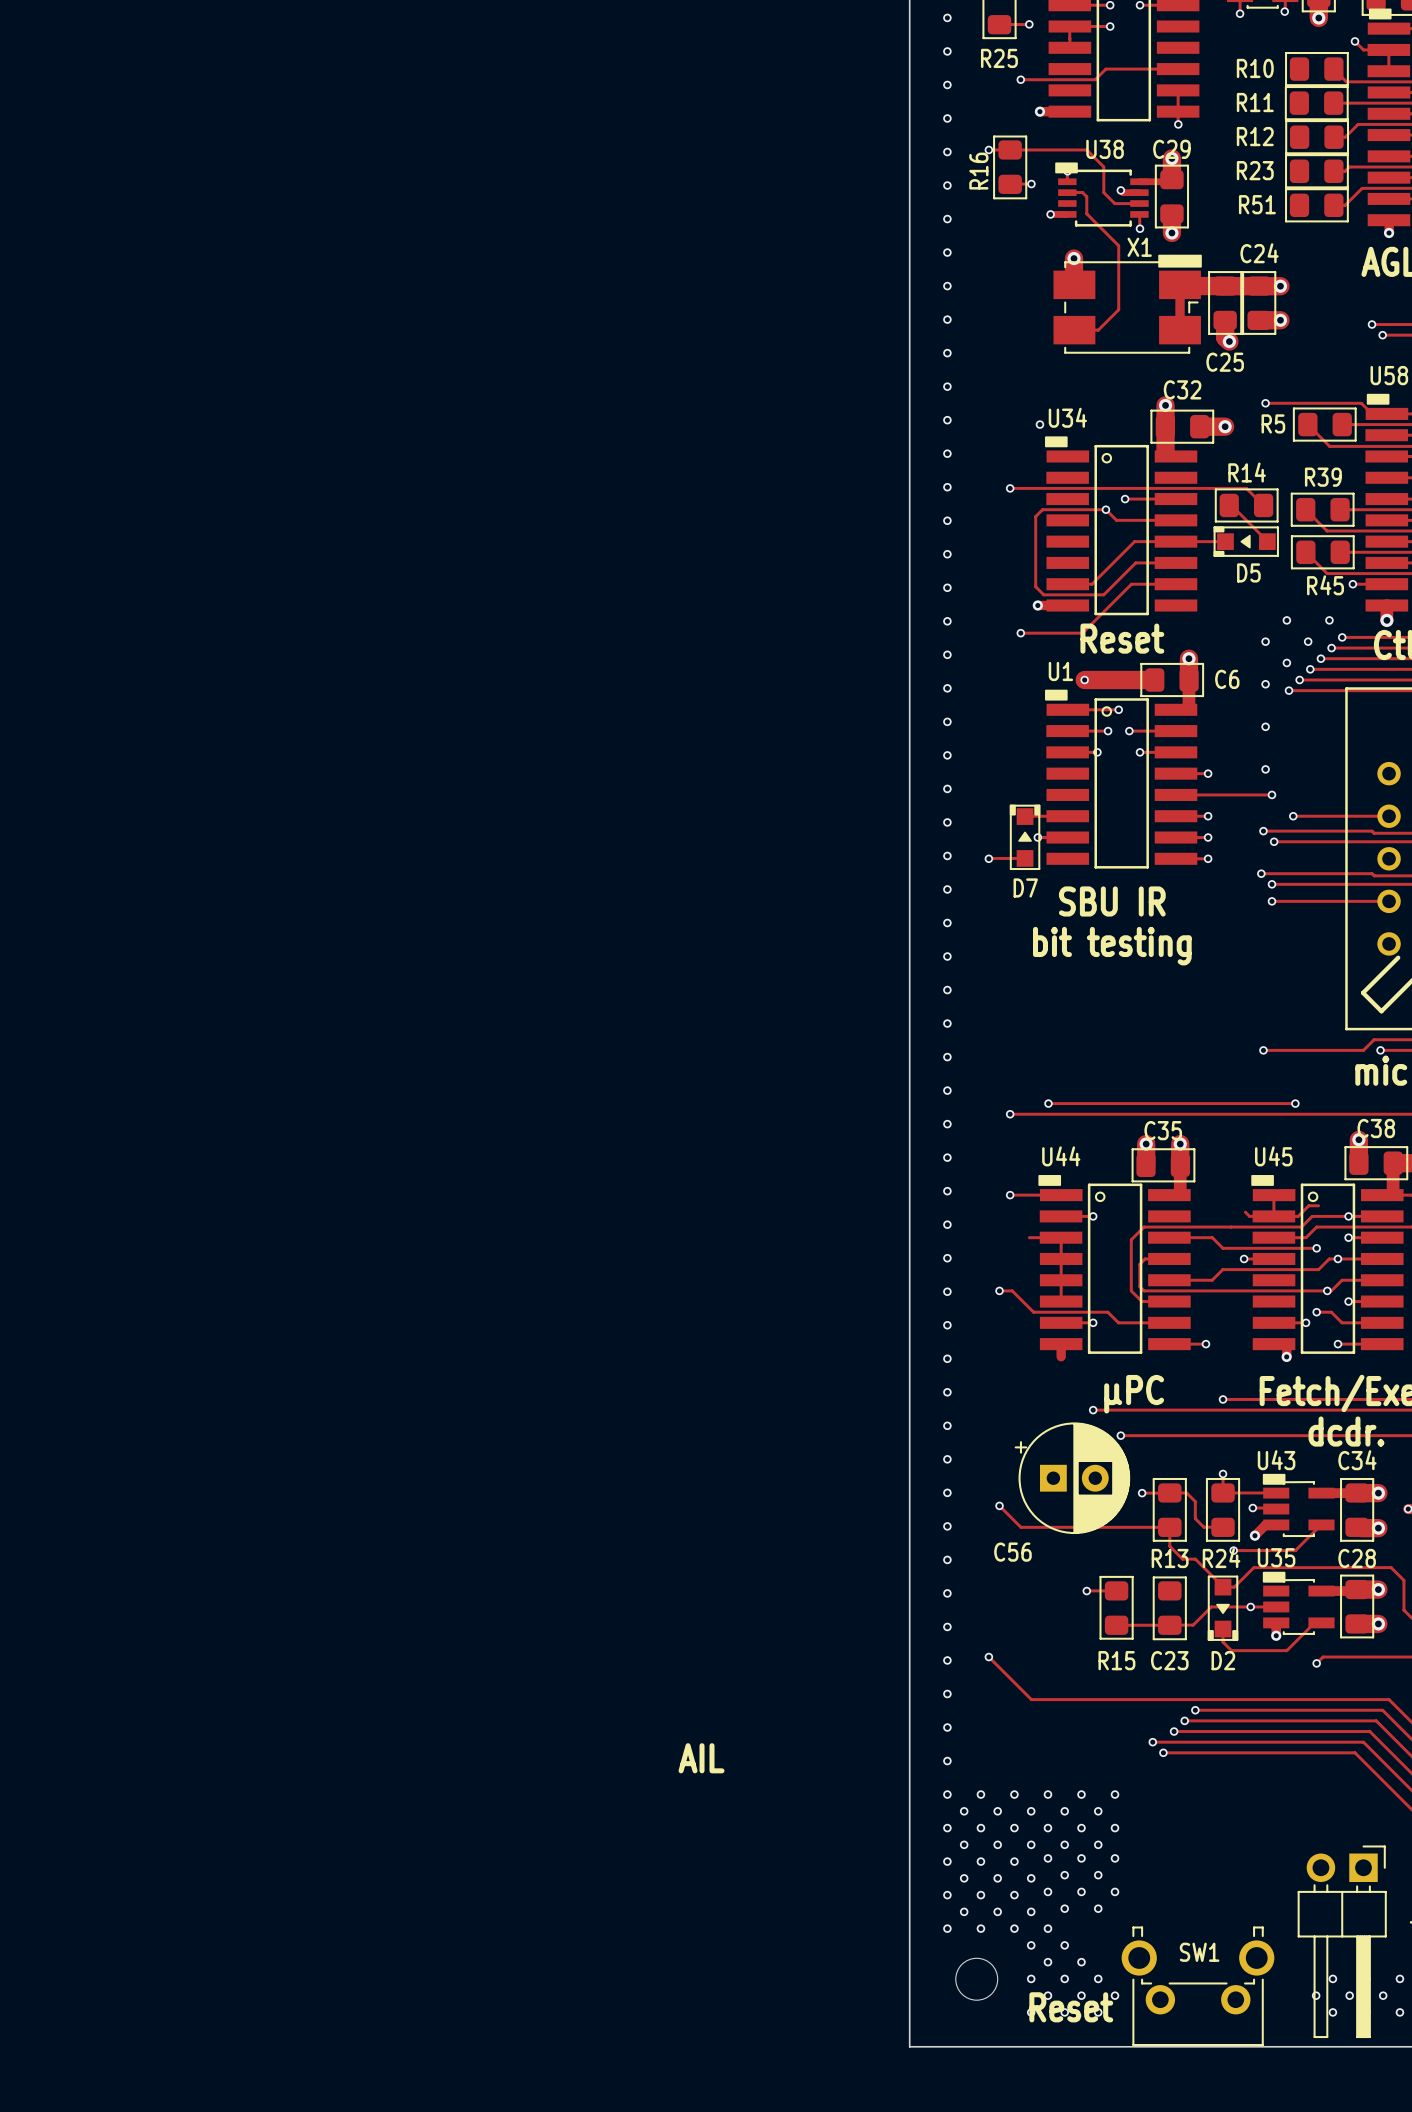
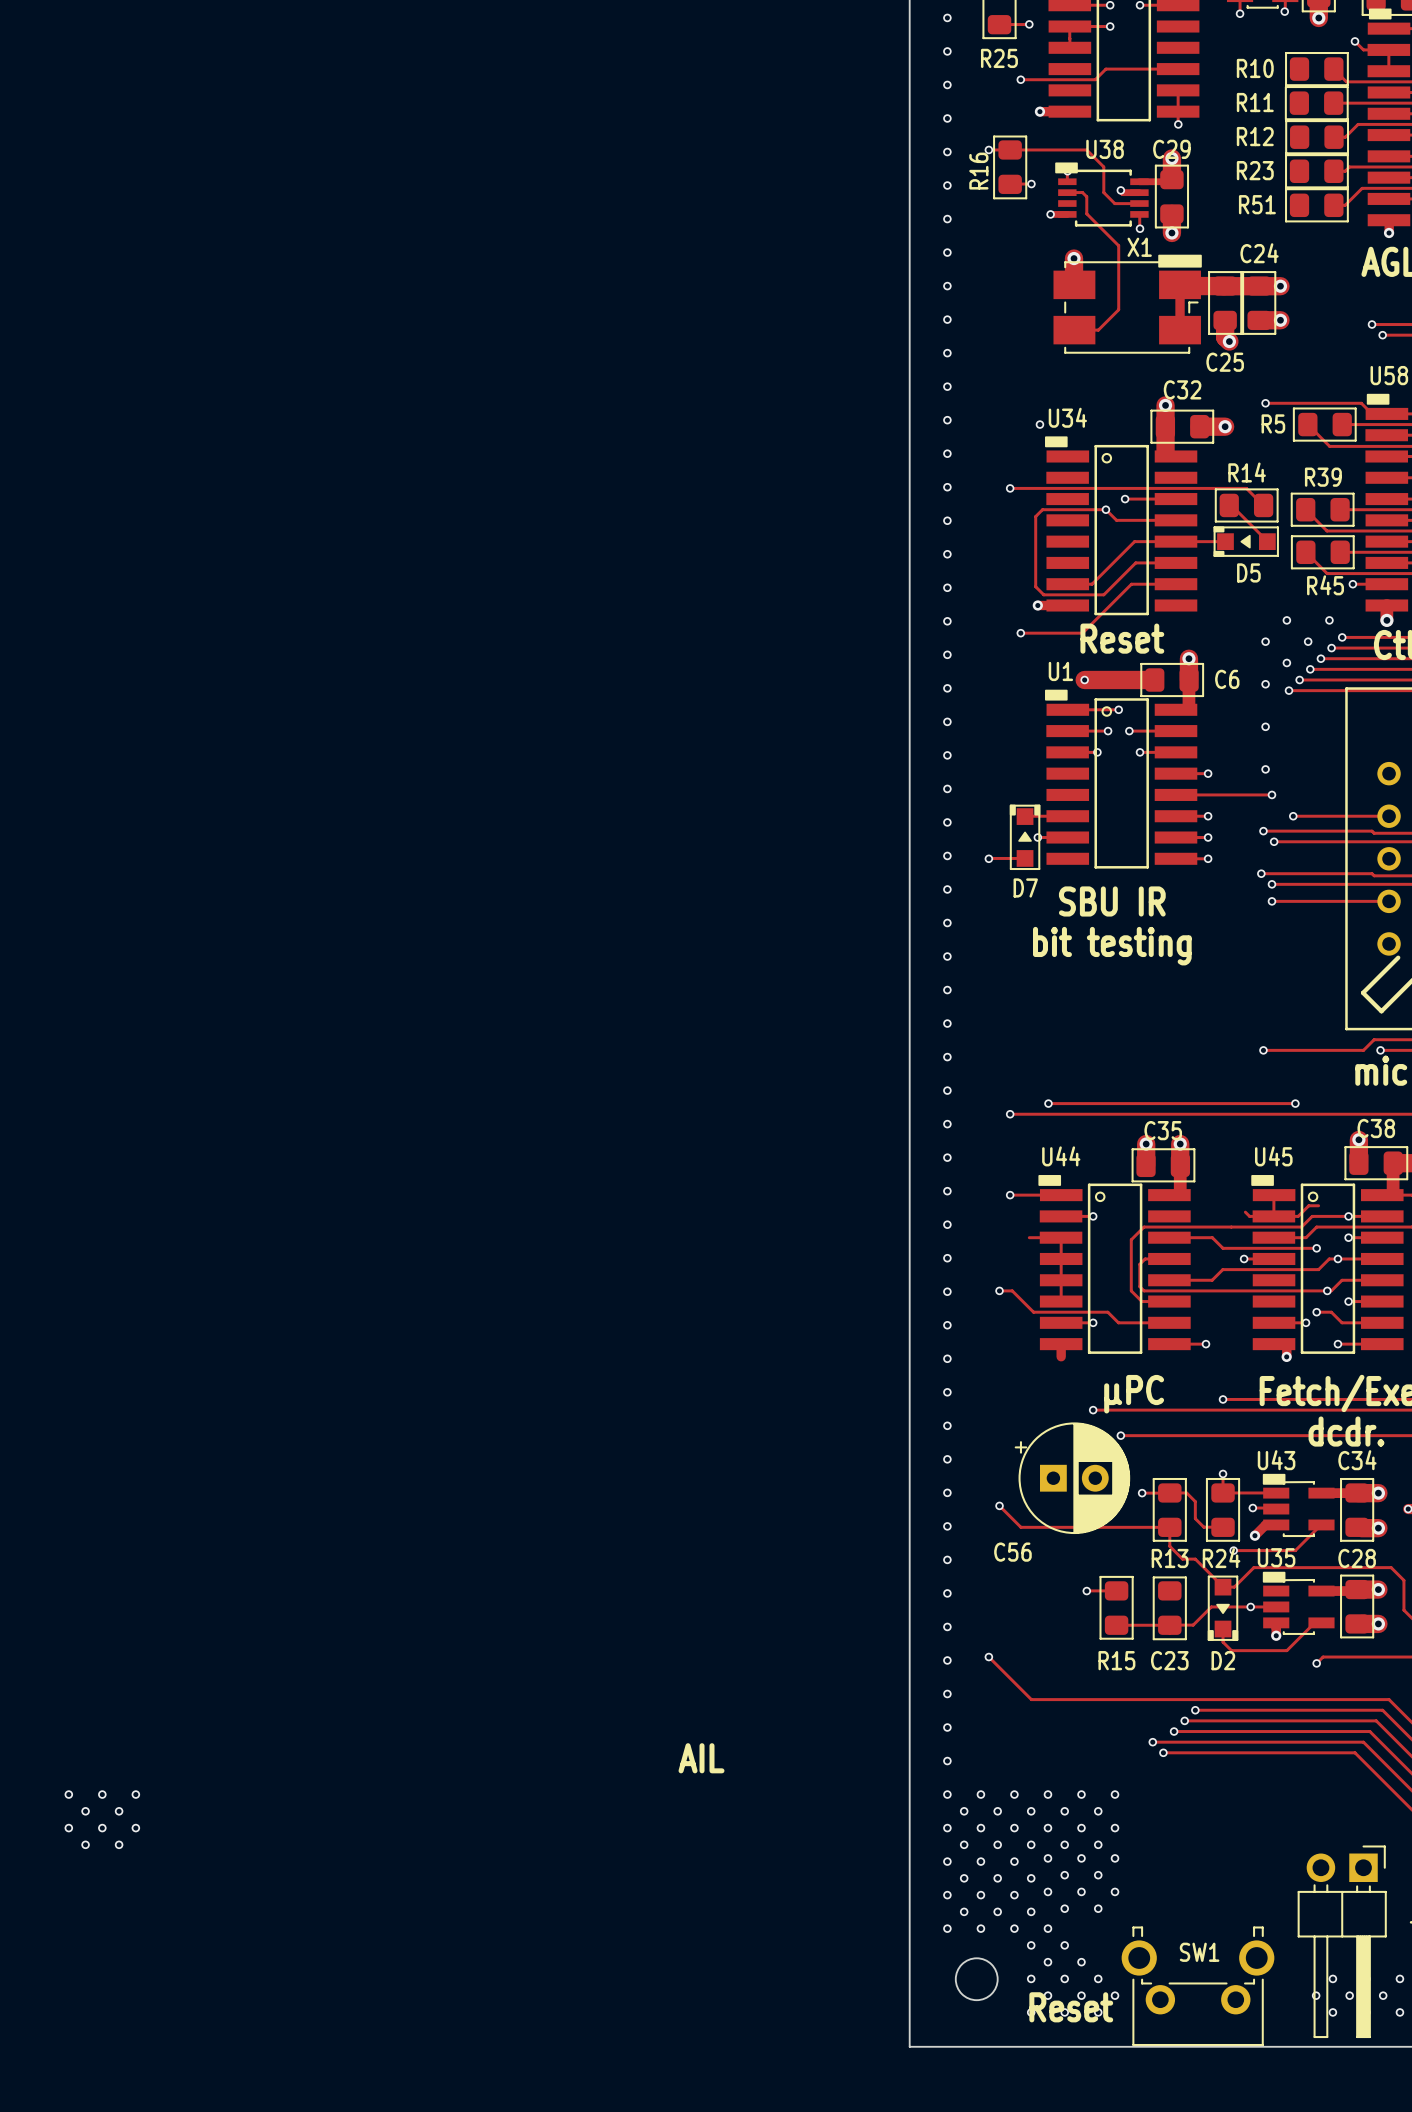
via: none -> (68, 1794)
via: none -> (102, 1794)
via: none -> (135, 1794)
via: none -> (85, 1811)
via: none -> (119, 1811)
via: none -> (68, 1828)
via: none -> (102, 1828)
via: none -> (135, 1828)
via: none -> (85, 1844)
via: none -> (119, 1844)

